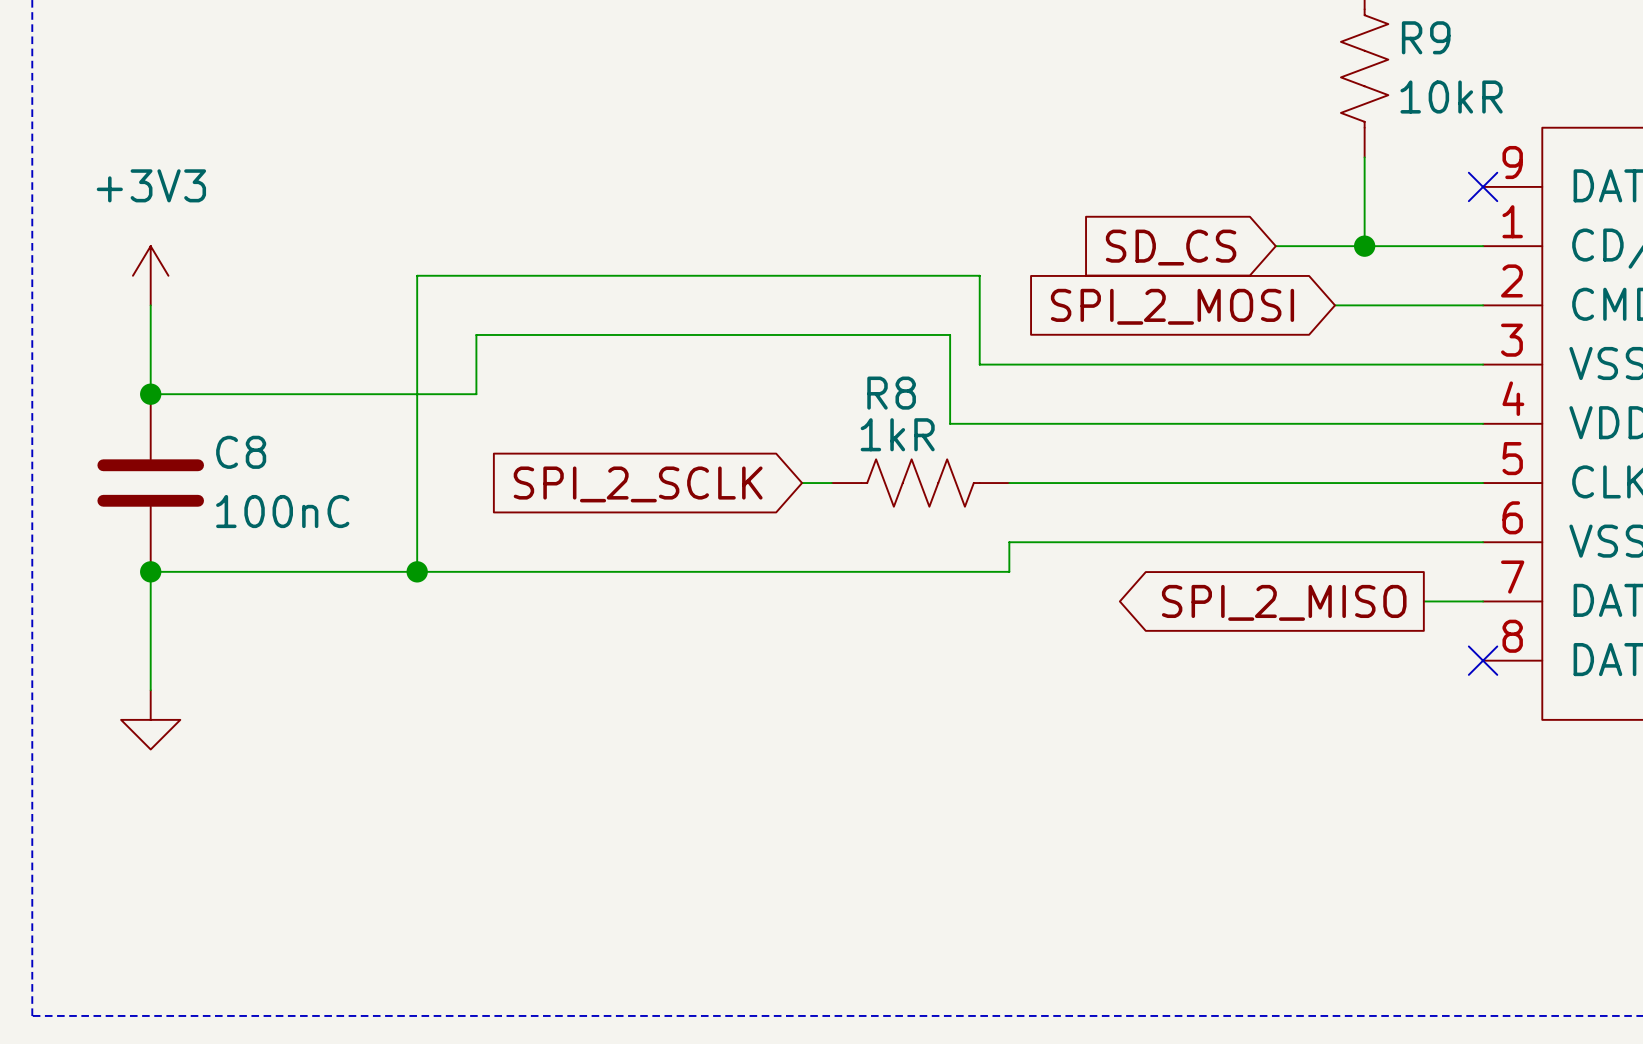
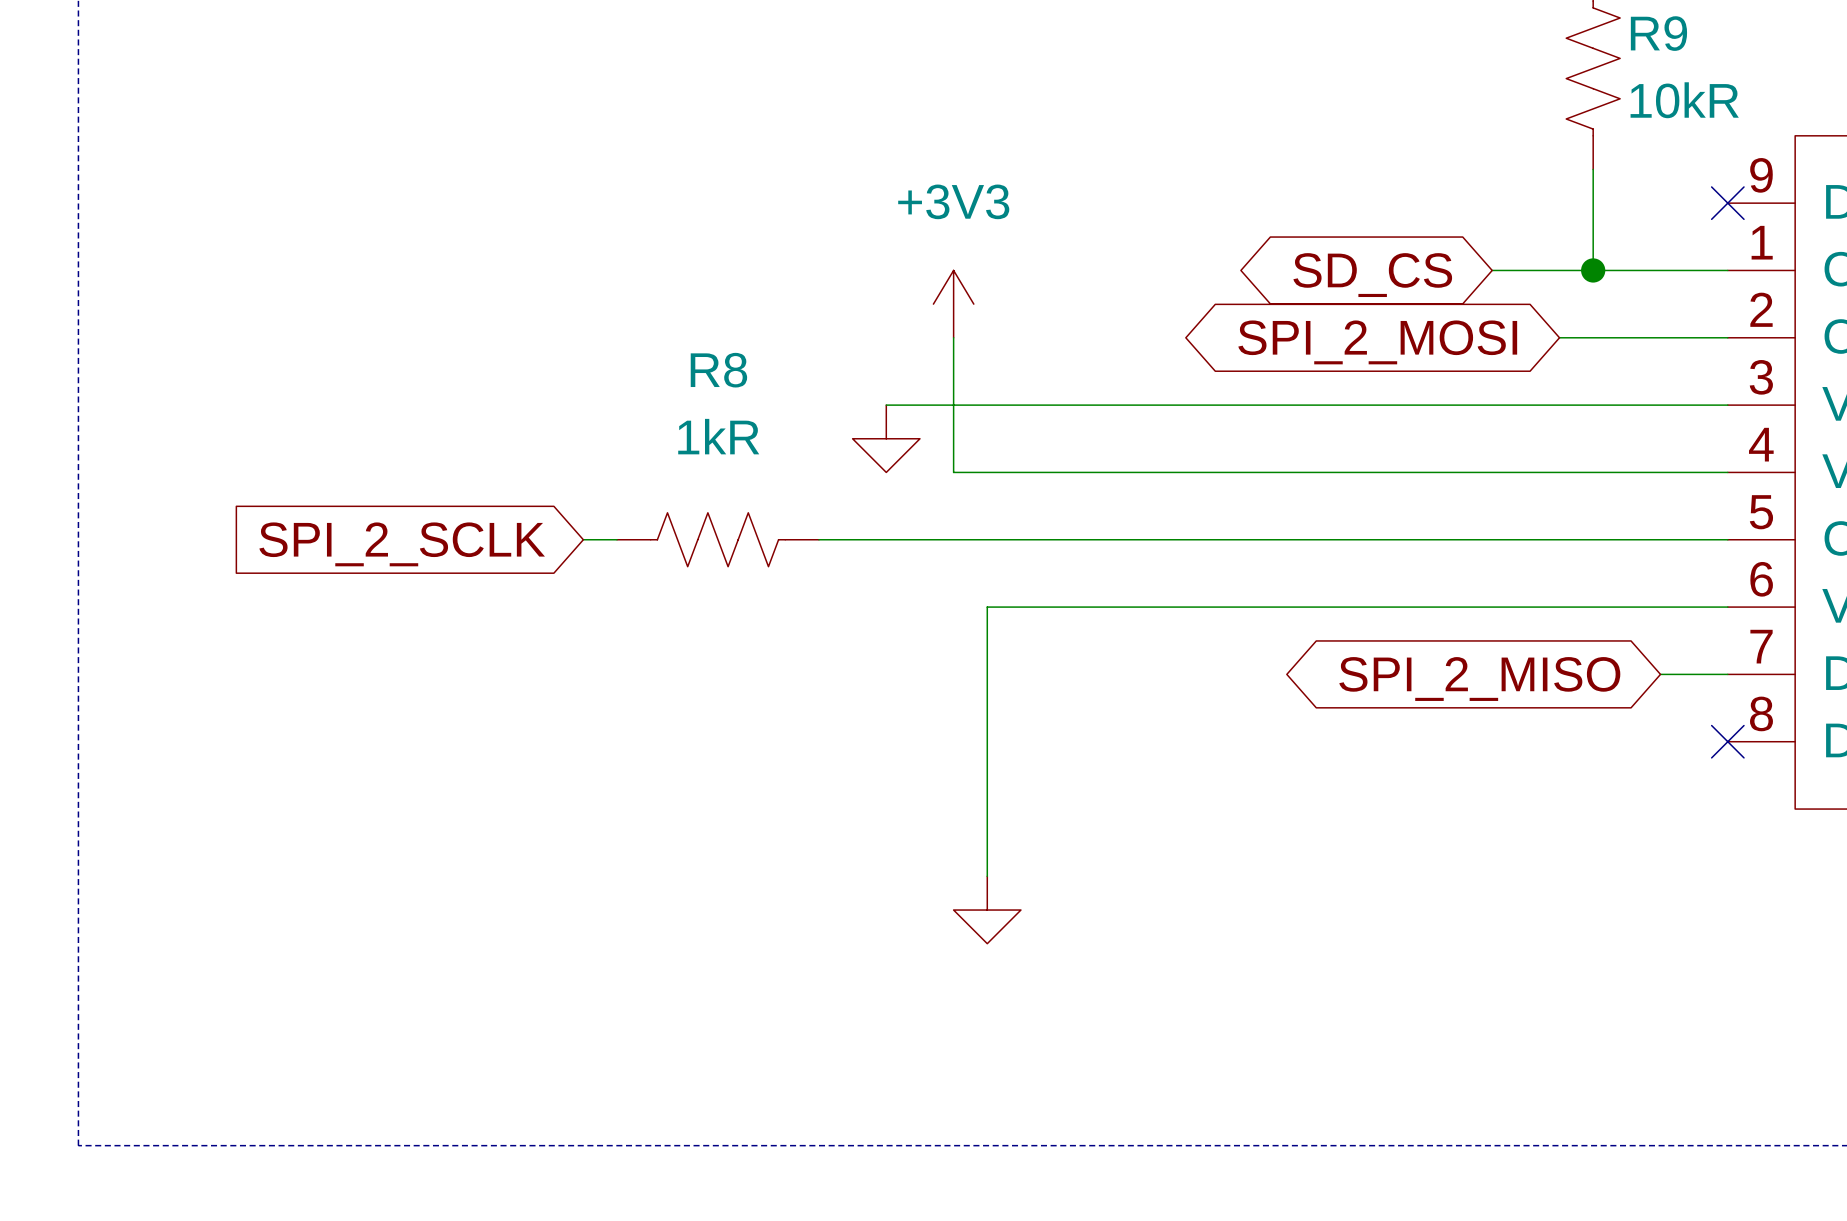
global label shape: input (1171, 247) -> bidirectional (1372, 275)
power symbol: +3V3 (150, 275) -> none
power symbol: none -> +3V3 (953, 304)
wire: (150, 305) (150, 394) (476, 394) (476, 334) (950, 334) (950, 423) -> (953, 337) (953, 472) (1121, 472)
global label shape: input (1172, 306) -> bidirectional (1377, 342)
wire: (979, 364) (979, 275) (417, 275) (417, 571) -> (1155, 405) (886, 405)
R8 name position: R8 (891, 393) -> R8 (718, 370)
junction: (150, 394) -> none
power symbol: none -> (886, 438)
R8 value position: 1kR (897, 434) -> 1kR (718, 436)
C8: 100nC (150, 483) -> none
wire: none -> (583, 539) (617, 539)
wire: none -> (818, 539) (953, 539)
wire: none -> (987, 539) (1189, 539)
R8 position: (920, 483) -> (717, 539)
global label position: SPI_2_SCLK (638, 484) -> SPI_2_SCLK (402, 544)
wire: (1009, 542) (1009, 571) (150, 571) (150, 690) -> (1189, 607) (987, 607) (987, 876)
junction: (150, 571) -> none
junction: (417, 571) -> none
global label shape: output (1284, 602) -> bidirectional (1479, 679)
power symbol: (150, 719) -> none
power symbol: none -> (987, 910)

